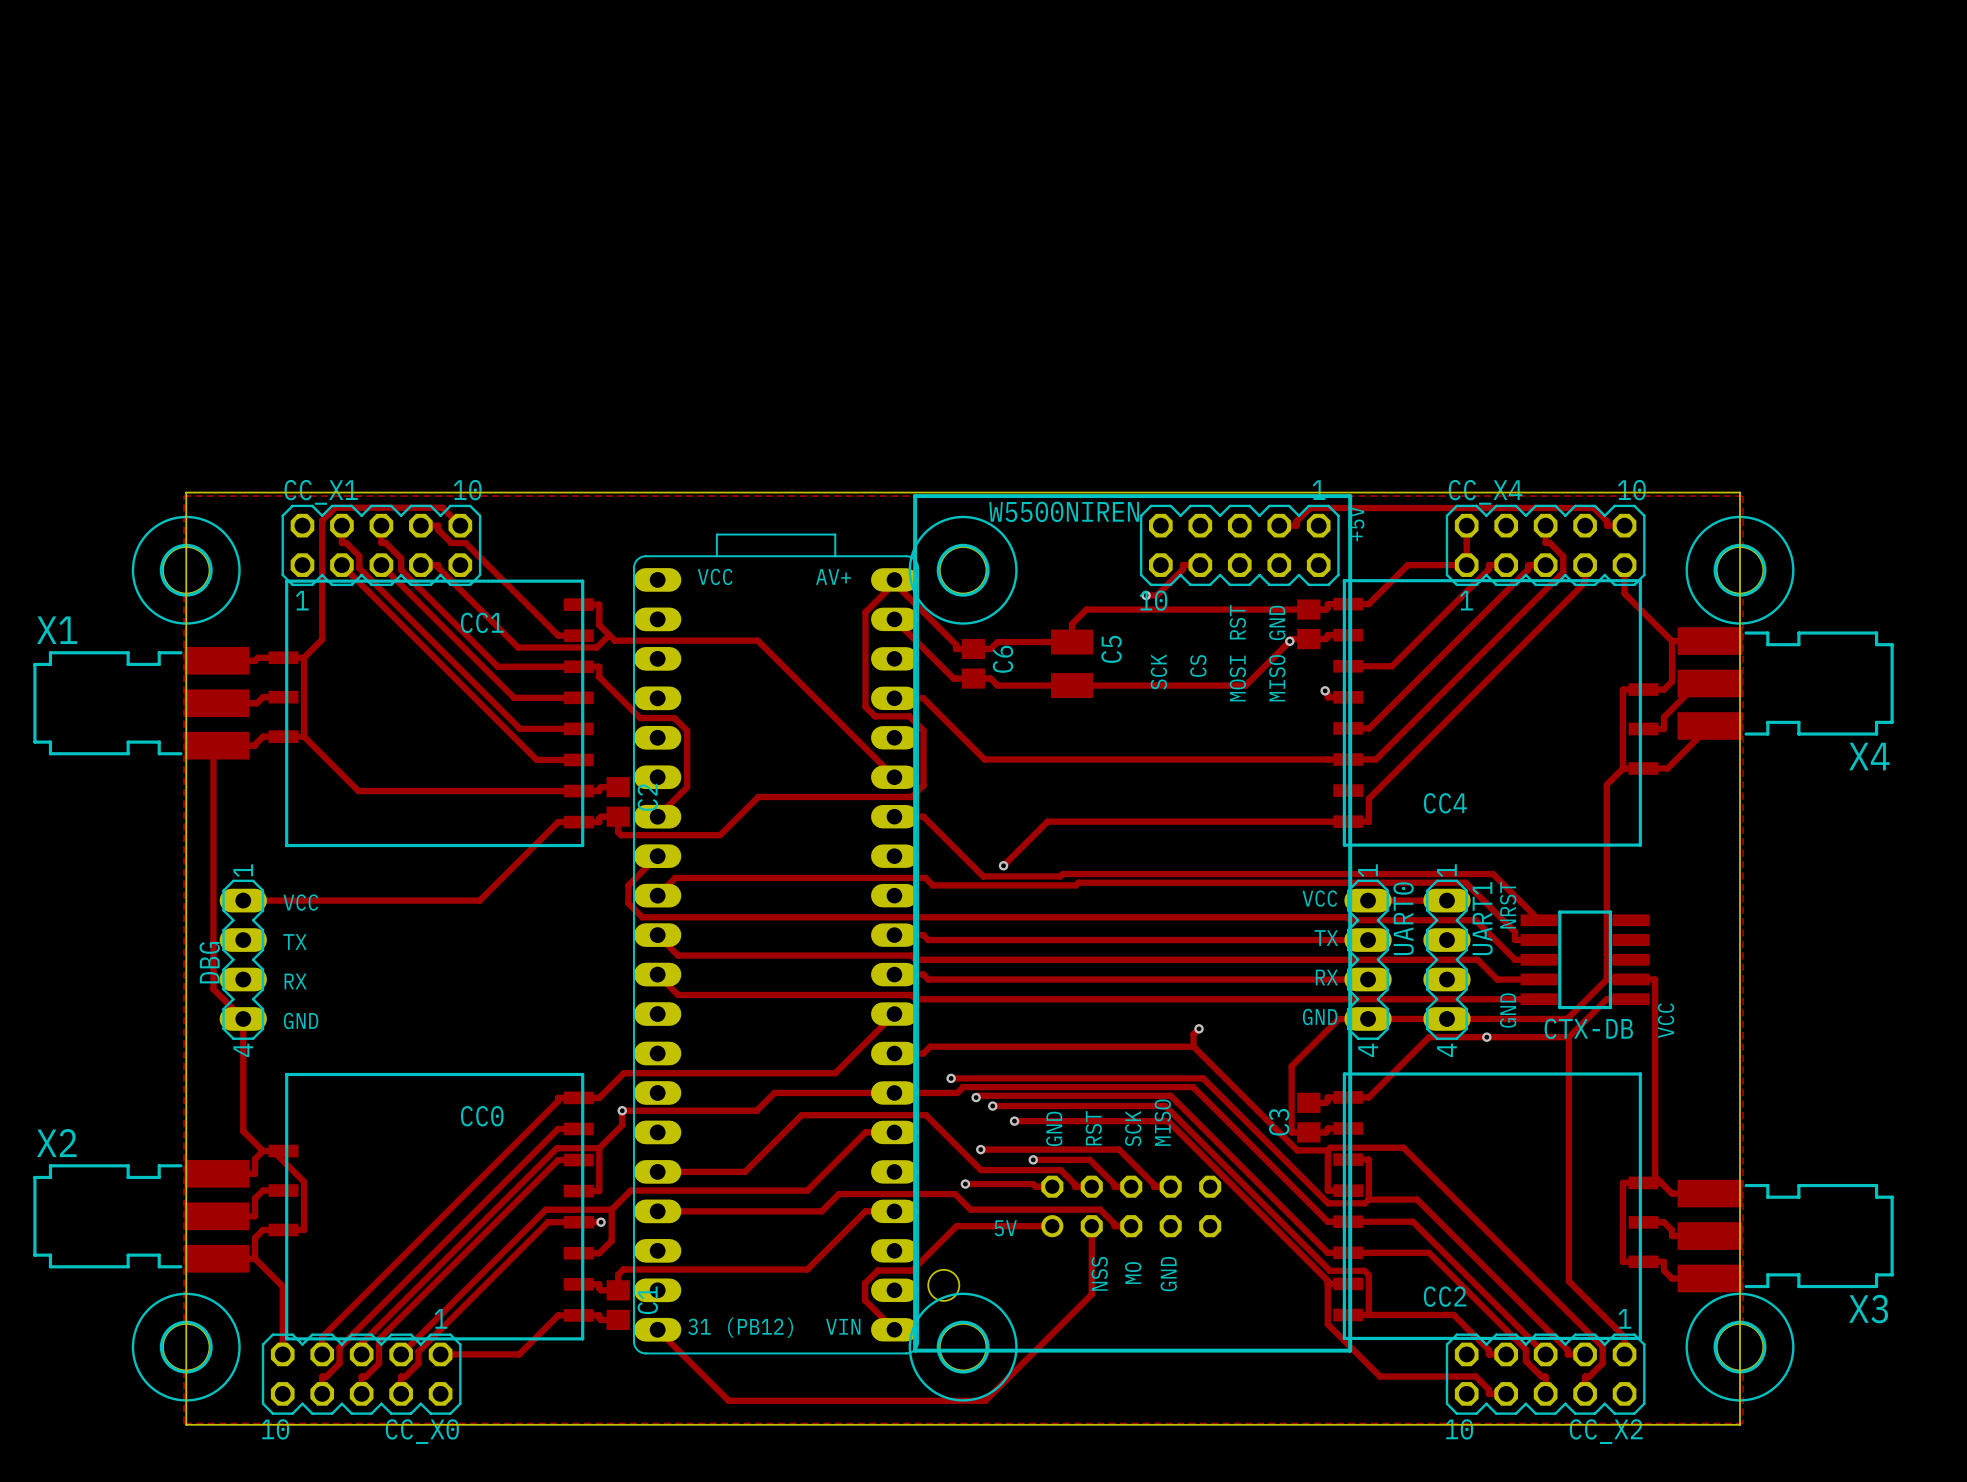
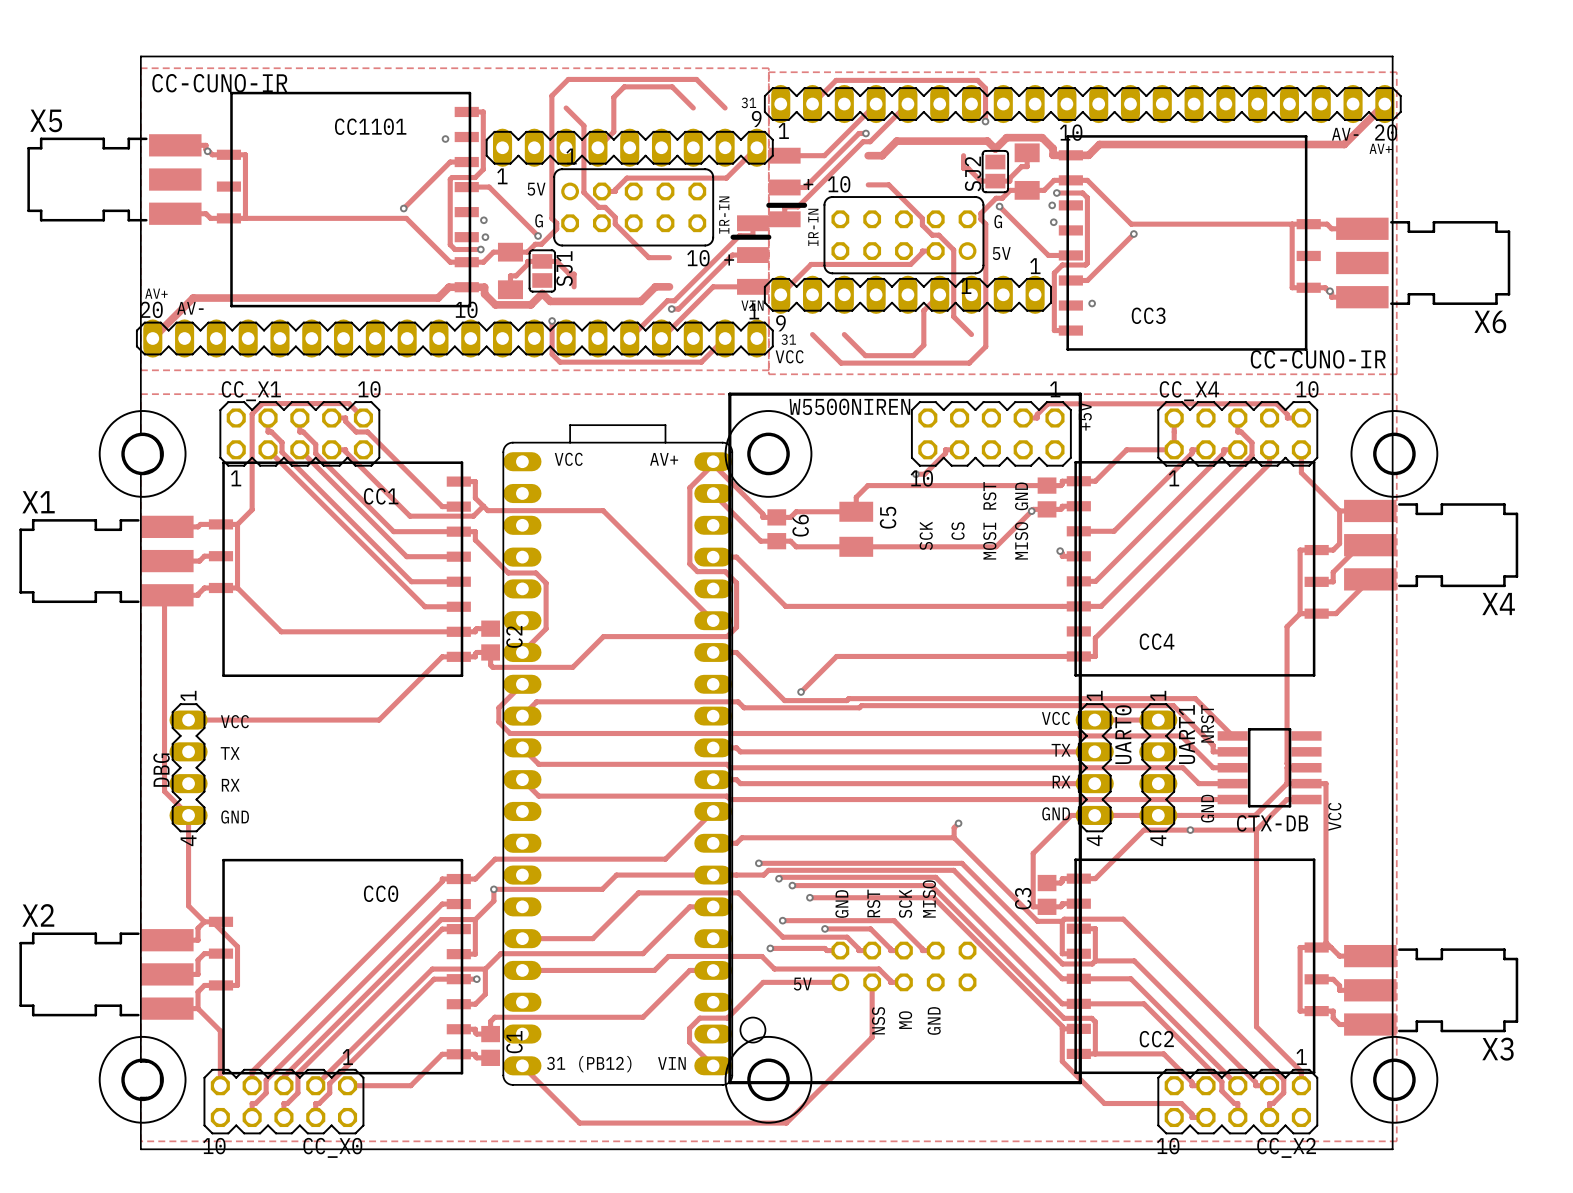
zone outline: none -> (768, 72) (1396, 72) (1396, 374) (768, 374) (768, 68) (140, 68) (140, 370) (768, 370)
text: none -> CC-CUNO-IR (219, 83)
text: none -> 31 (748, 102)
track: none -> (812, 104) (836, 80) (977, 80) (985, 88) (985, 121)
track: none -> (876, 104) (824, 155) (784, 155)
track: none -> (907, 104) (870, 141) (863, 141) (798, 206) (784, 206) (784, 219)
part: none -> (1082, 104)
track: none -> (1384, 104) (1344, 144) (1099, 144) (1088, 155) (1053, 155) (1053, 148) (1042, 137) (1006, 137) (995, 149) (987, 141) (896, 141) (882, 155) (868, 155)
track: none -> (566, 107) (583, 125) (583, 192) (598, 207) (605, 207) (615, 217) (615, 224) (648, 257) (669, 257)
track: none -> (693, 107) (672, 86) (624, 86) (613, 97) (613, 131) (597, 147)
track: none -> (725, 107) (696, 79) (568, 79) (551, 95) (551, 218) (556, 223) (556, 229) (541, 244) (535, 244) (527, 252) (493, 252) (483, 262) (450, 262) (406, 218) (210, 218) (205, 213) (175, 213)
track: none -> (466, 111) (483, 111) (483, 169) (475, 177) (452, 177) (450, 179) (450, 244) (455, 249) (480, 249)
via: none -> (985, 121)
track: none -> (865, 133) (859, 133) (805, 187) (784, 187)
via: none -> (865, 133)
text: none -> AV- (1345, 134)
via: none -> (445, 139)
track: none -> (175, 145) (205, 145) (205, 149) (212, 154) (245, 154) (245, 218)
part: none -> (629, 147)
track: none -> (756, 147) (726, 178) (626, 178) (615, 191) (601, 191)
text: none -> AV+ (1380, 148)
via: none -> (207, 151)
track: none -> (1027, 152) (1027, 166) (1021, 166) (1009, 178) (1009, 181) (980, 181) (968, 168) (963, 168) (963, 155)
part: none -> (784, 155)
track: none -> (466, 162) (450, 162) (403, 208)
SJ2: none -> (995, 171)
part: none -> (1027, 171)
X5: none -> (114, 179)
text: none -> + (808, 184)
track: none -> (868, 184) (888, 184) (922, 218) (922, 225) (932, 235) (938, 235) (953, 250) (953, 316) (971, 334)
track: none -> (466, 187) (489, 187) (538, 236)
part: none -> (784, 187)
text: none -> 5V (536, 189)
track: none -> (1056, 193) (1082, 193) (1087, 197) (1087, 263) (1085, 264) (1062, 264) (1054, 273) (1054, 330) (1070, 330)
via: none -> (1056, 193)
CC1101: none -> (347, 199)
line: none -> (768, 205) (804, 205)
via: none -> (1052, 205)
track: none -> (999, 206) (1048, 255) (1070, 255)
via: none -> (999, 206)
part: none -> (633, 207)
via: none -> (403, 208)
text: none -> IR-IN (724, 215)
part: none -> (784, 219)
via: none -> (483, 220)
text: none -> G (539, 220)
text: none -> G (998, 221)
via: none -> (1053, 222)
track: none -> (752, 223) (752, 235) (739, 235) (674, 300) (667, 300) (629, 338)
part: none -> (752, 223)
track: none -> (1292, 224) (1292, 287) (1325, 287) (1331, 292) (1331, 297) (1362, 297)
text: none -> IR-IN (813, 227)
track: none -> (1362, 228) (1331, 228) (1327, 224) (1131, 224) (1087, 180) (1054, 180) (1044, 190) (1010, 190) (1002, 198) (996, 198) (980, 213) (980, 219) (985, 224) (985, 346) (969, 363) (841, 363) (812, 334)
track: none -> (1133, 234) (1087, 280) (1070, 280)
via: none -> (1133, 234)
part: none -> (903, 235)
via: none -> (538, 236)
via: none -> (485, 237)
line: none -> (733, 237) (768, 237)
CC3: none -> (1189, 242)
via: none -> (480, 249)
track: none -> (935, 251) (922, 251) (910, 264) (811, 264) (780, 294)
text: none -> 5V (1001, 253)
track: none -> (752, 255) (732, 255) (678, 309) (671, 309)
part: none -> (752, 255)
text: none -> + (729, 260)
X6: none -> (1423, 263)
part: none -> (510, 270)
SJ1: none -> (542, 270)
track: none -> (574, 286) (574, 274) (569, 274) (556, 261) (527, 261) (527, 264) (516, 275) (510, 275) (510, 289)
track: none -> (669, 286) (655, 286) (640, 301) (550, 301) (542, 293) (530, 304) (495, 304) (484, 293) (484, 287) (448, 287) (438, 298) (193, 298) (152, 338)
track: none -> (752, 286) (713, 286) (661, 338)
part: none -> (752, 286)
via: none -> (1329, 291)
text: none -> AV+ (156, 293)
part: none -> (907, 294)
track: none -> (939, 294) (923, 310) (923, 345) (913, 355) (865, 355) (844, 334)
via: none -> (1092, 303)
text: none -> VIN (752, 305)
text: none -> AV- (190, 308)
via: none -> (671, 309)
track: none -> (552, 320) (552, 354) (560, 362) (701, 362) (725, 338)
via: none -> (552, 320)
part: none -> (454, 338)
text: none -> 31 (788, 339)
text: none -> VCC (789, 356)
text: none -> CC-CUNO-IR (1318, 359)
board edge: (186, 492) (186, 1424) (1740, 1424) (1740, 492) (186, 492) -> (140, 56) (140, 433) (148, 435) (154, 439) (159, 446) (160, 453) (160, 461) (157, 466) (140, 473) (140, 1061) (155, 1064) (160, 1076) (160, 1087) (156, 1093) (150, 1097) (140, 1097) (140, 1149) (1392, 1149) (1392, 56) (140, 56)

